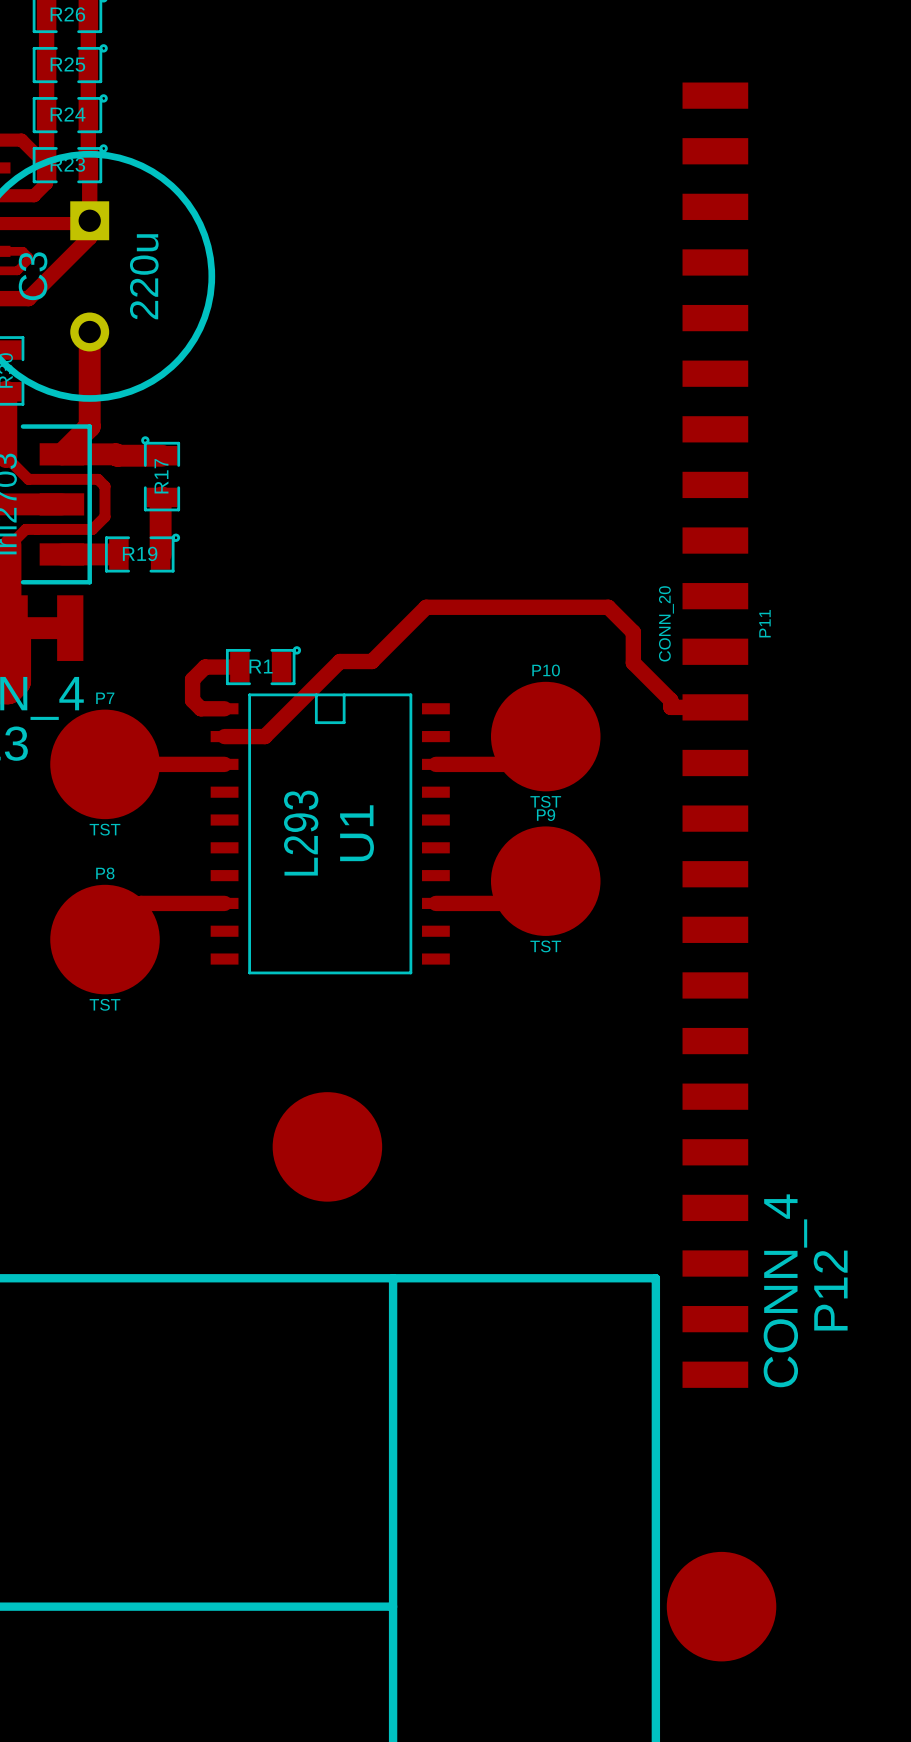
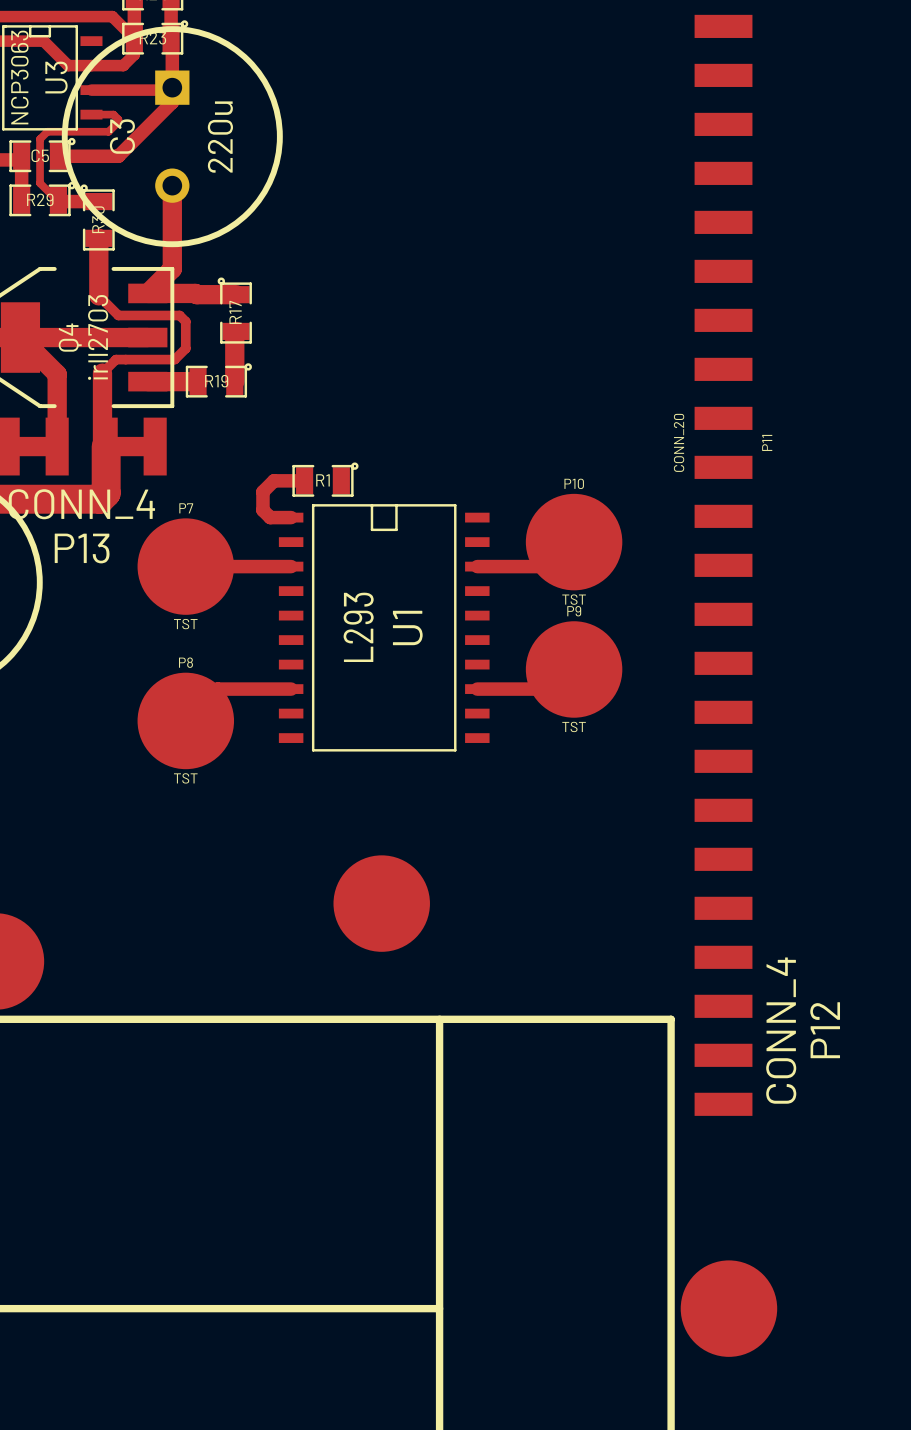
track: (715, 707) (670, 707) (670, 700) (633, 662) (633, 632) (608, 607) (426, 607) (371, 661) (339, 661) (264, 736) (224, 736) -> none

